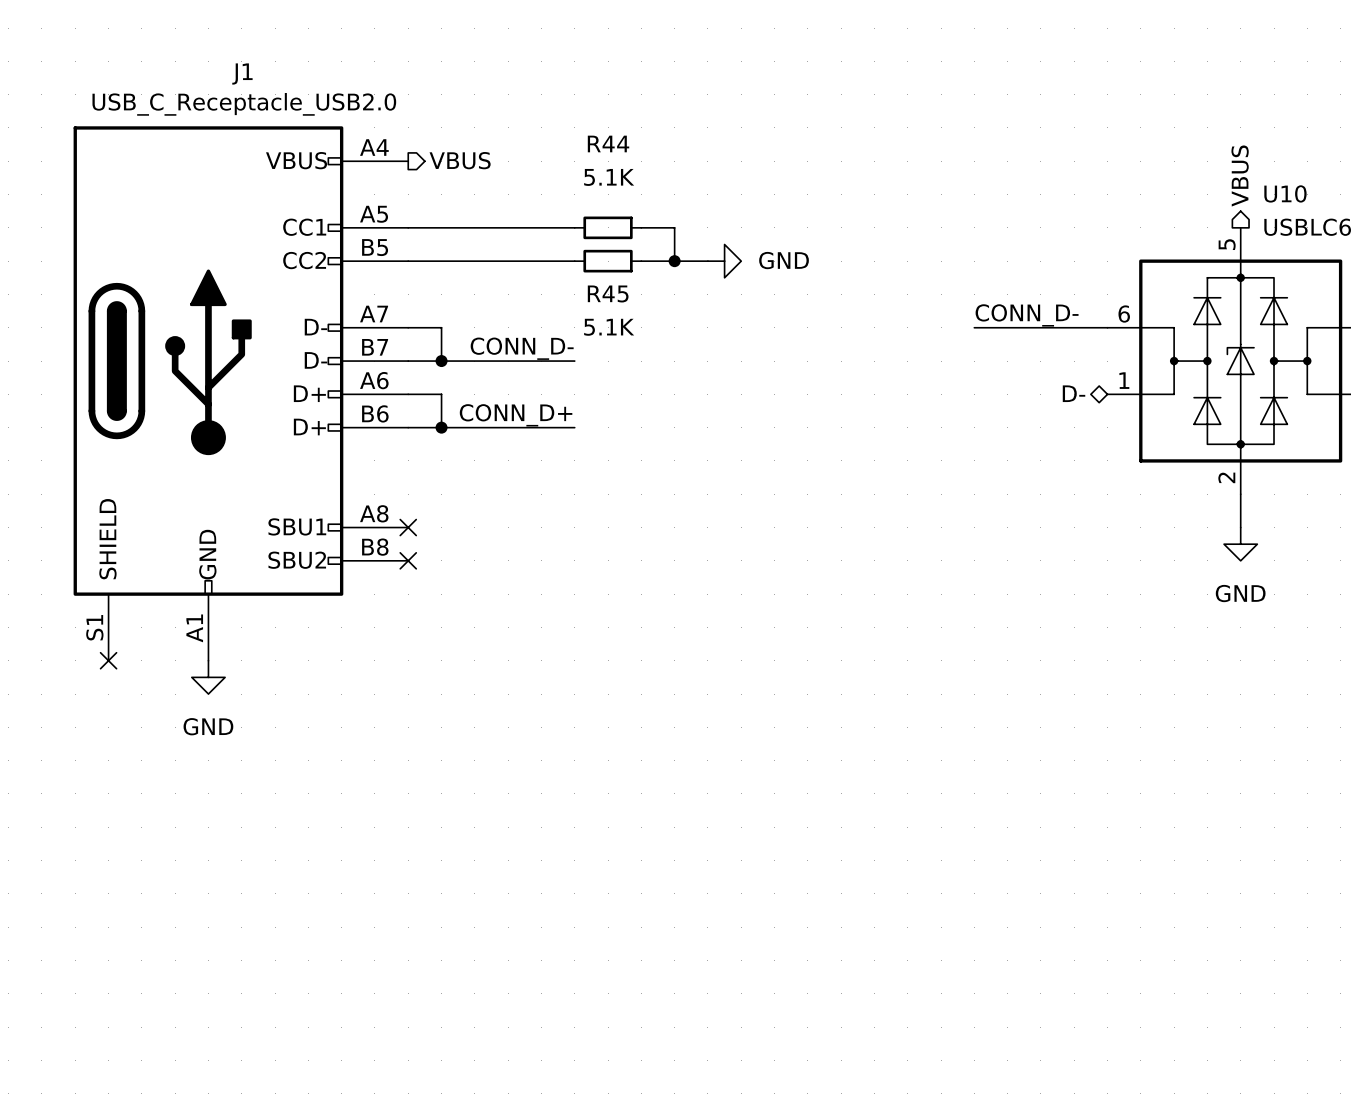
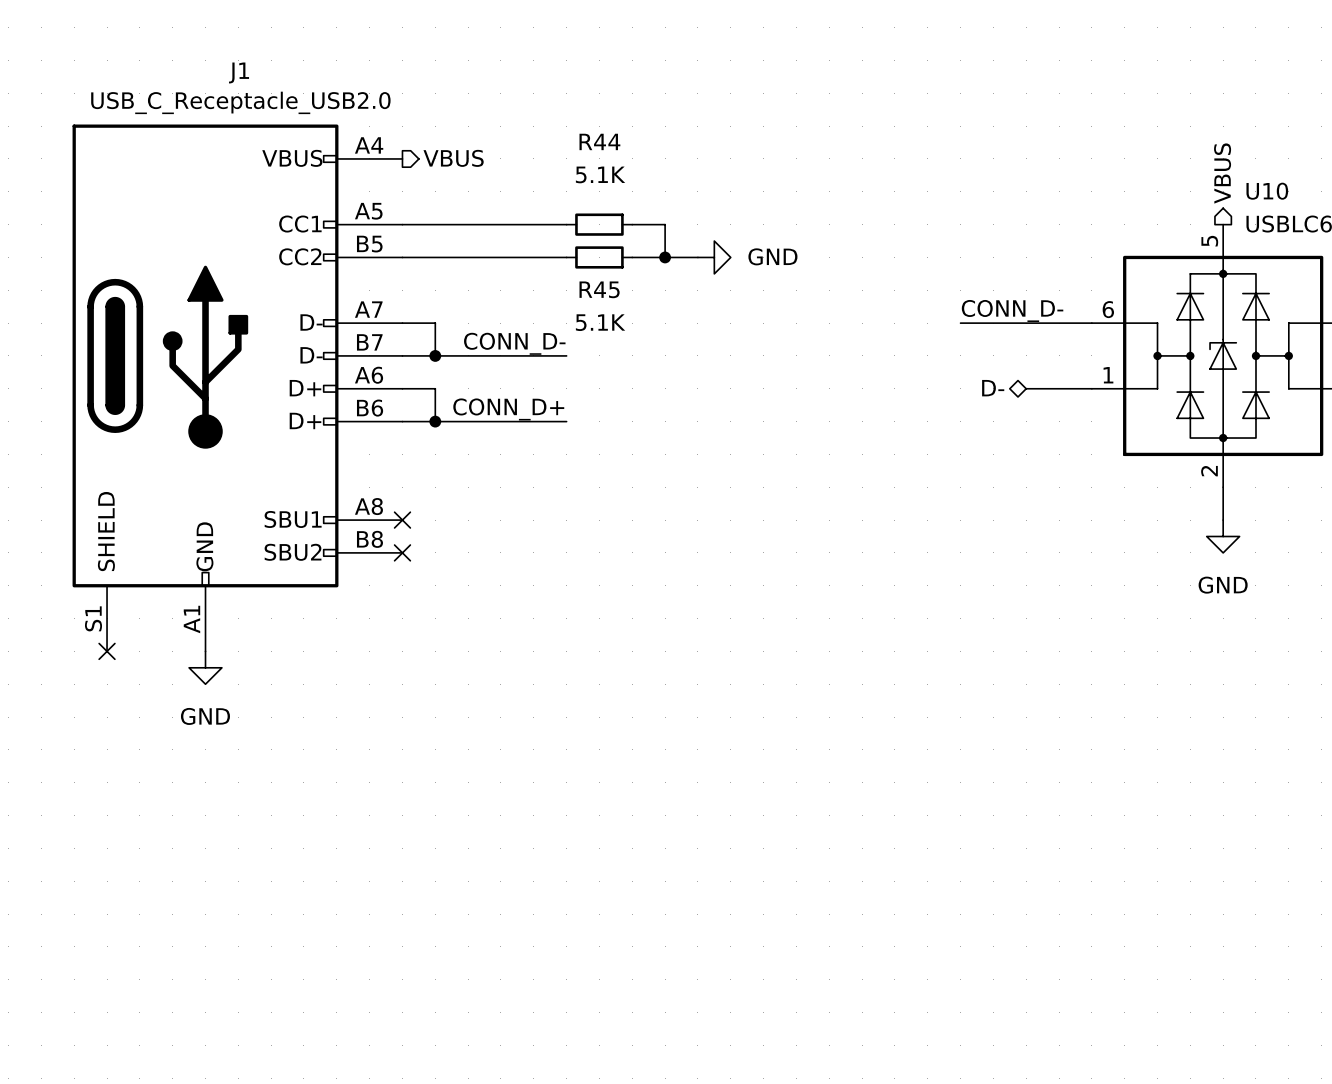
hierarchical label position: D- (1074, 393) -> D- (993, 388)
wire: none -> (1026, 388) (1091, 388)

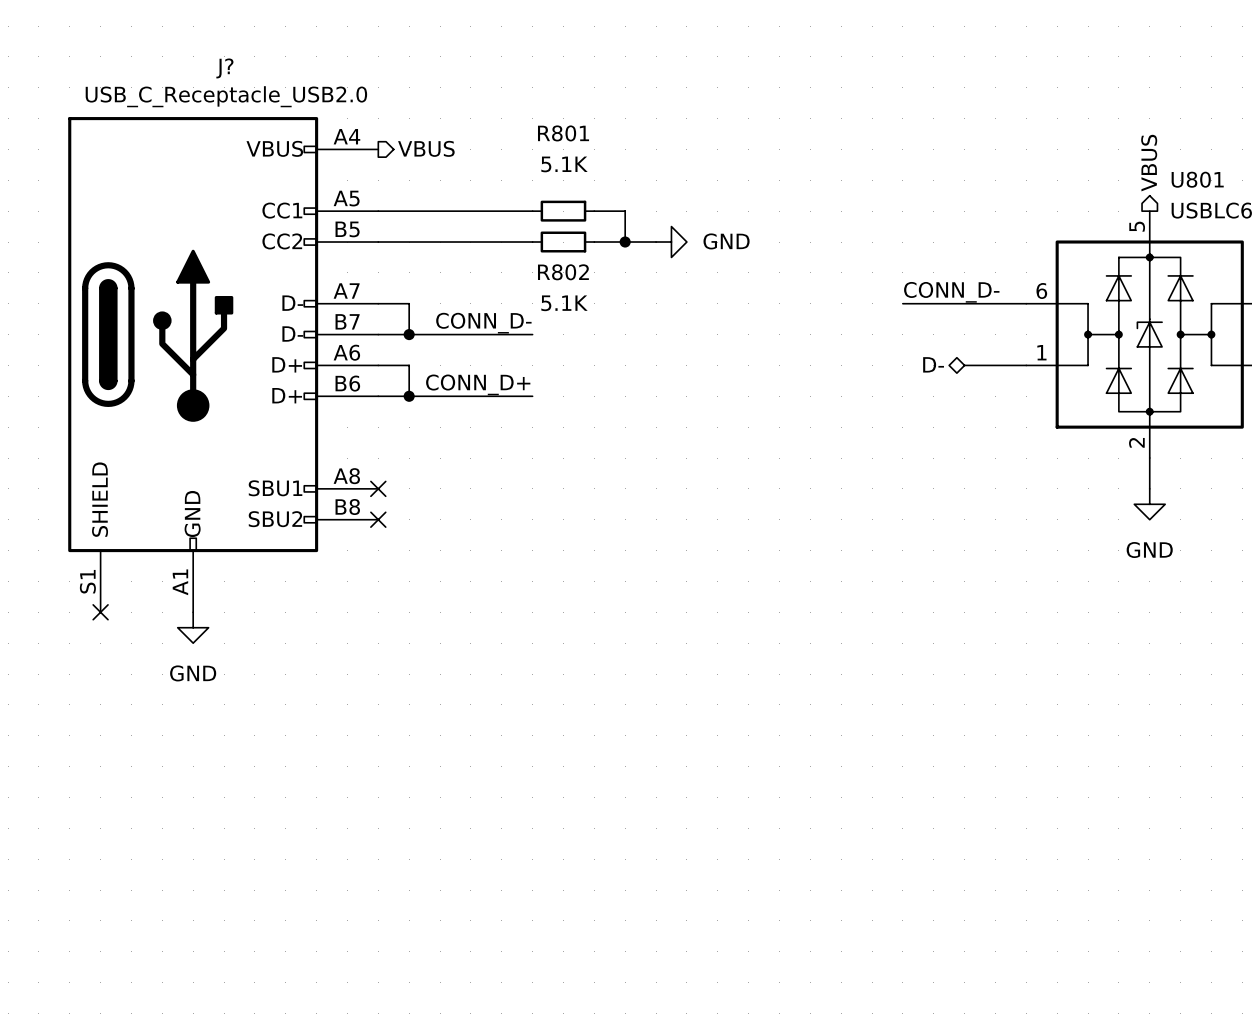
J1 name: J1 (239, 72) -> J? (224, 68)
R44 name: R44 (599, 141) -> R801 (563, 133)
U10 name: U10 (1267, 191) -> U801 (1197, 179)
R45 name: R45 (599, 289) -> R802 (563, 272)

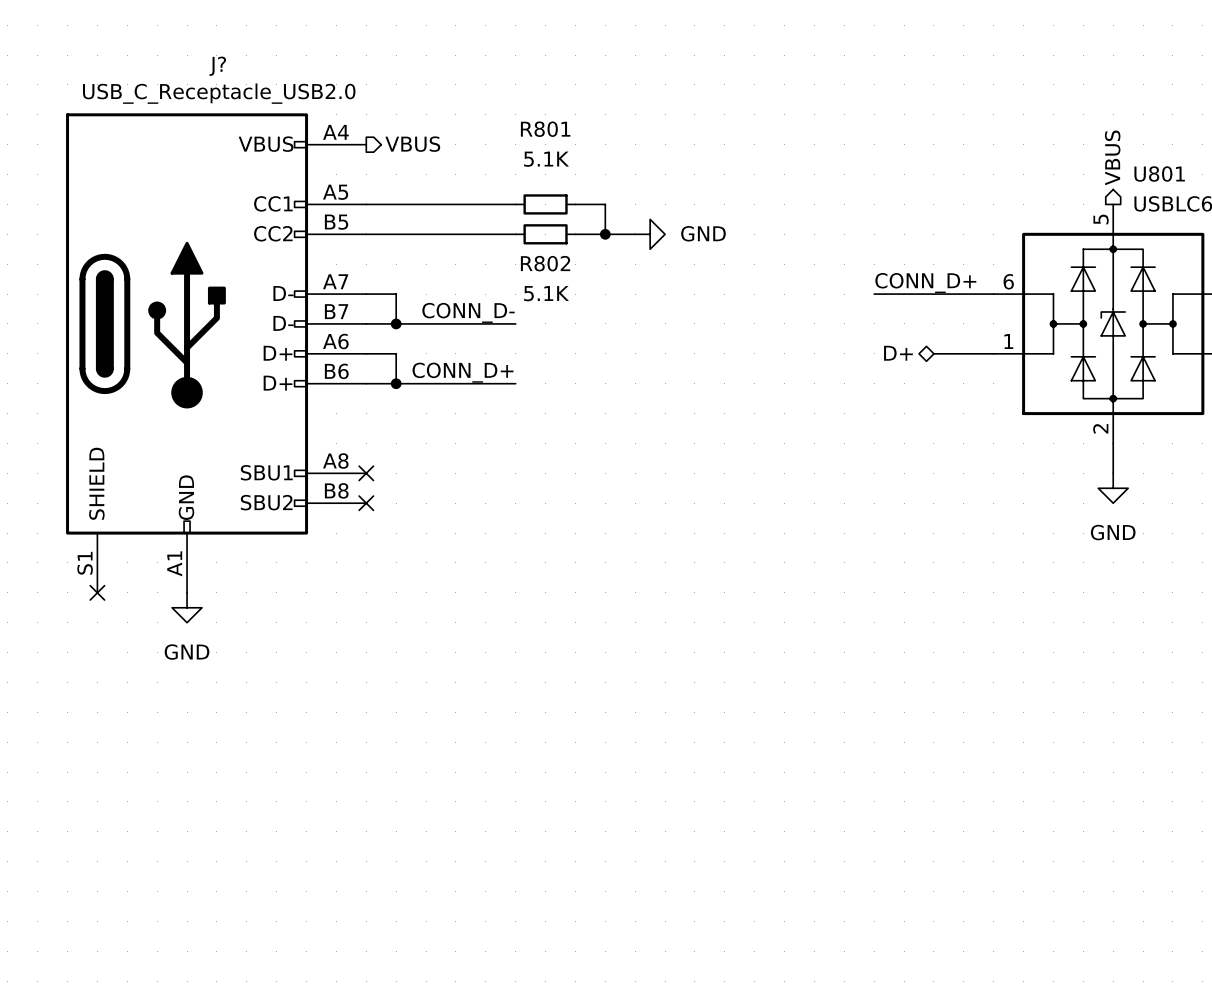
label: CONN_D- (951, 292) -> CONN_D+ (925, 283)
hierarchical label: D- (933, 364) -> D+ (898, 353)

